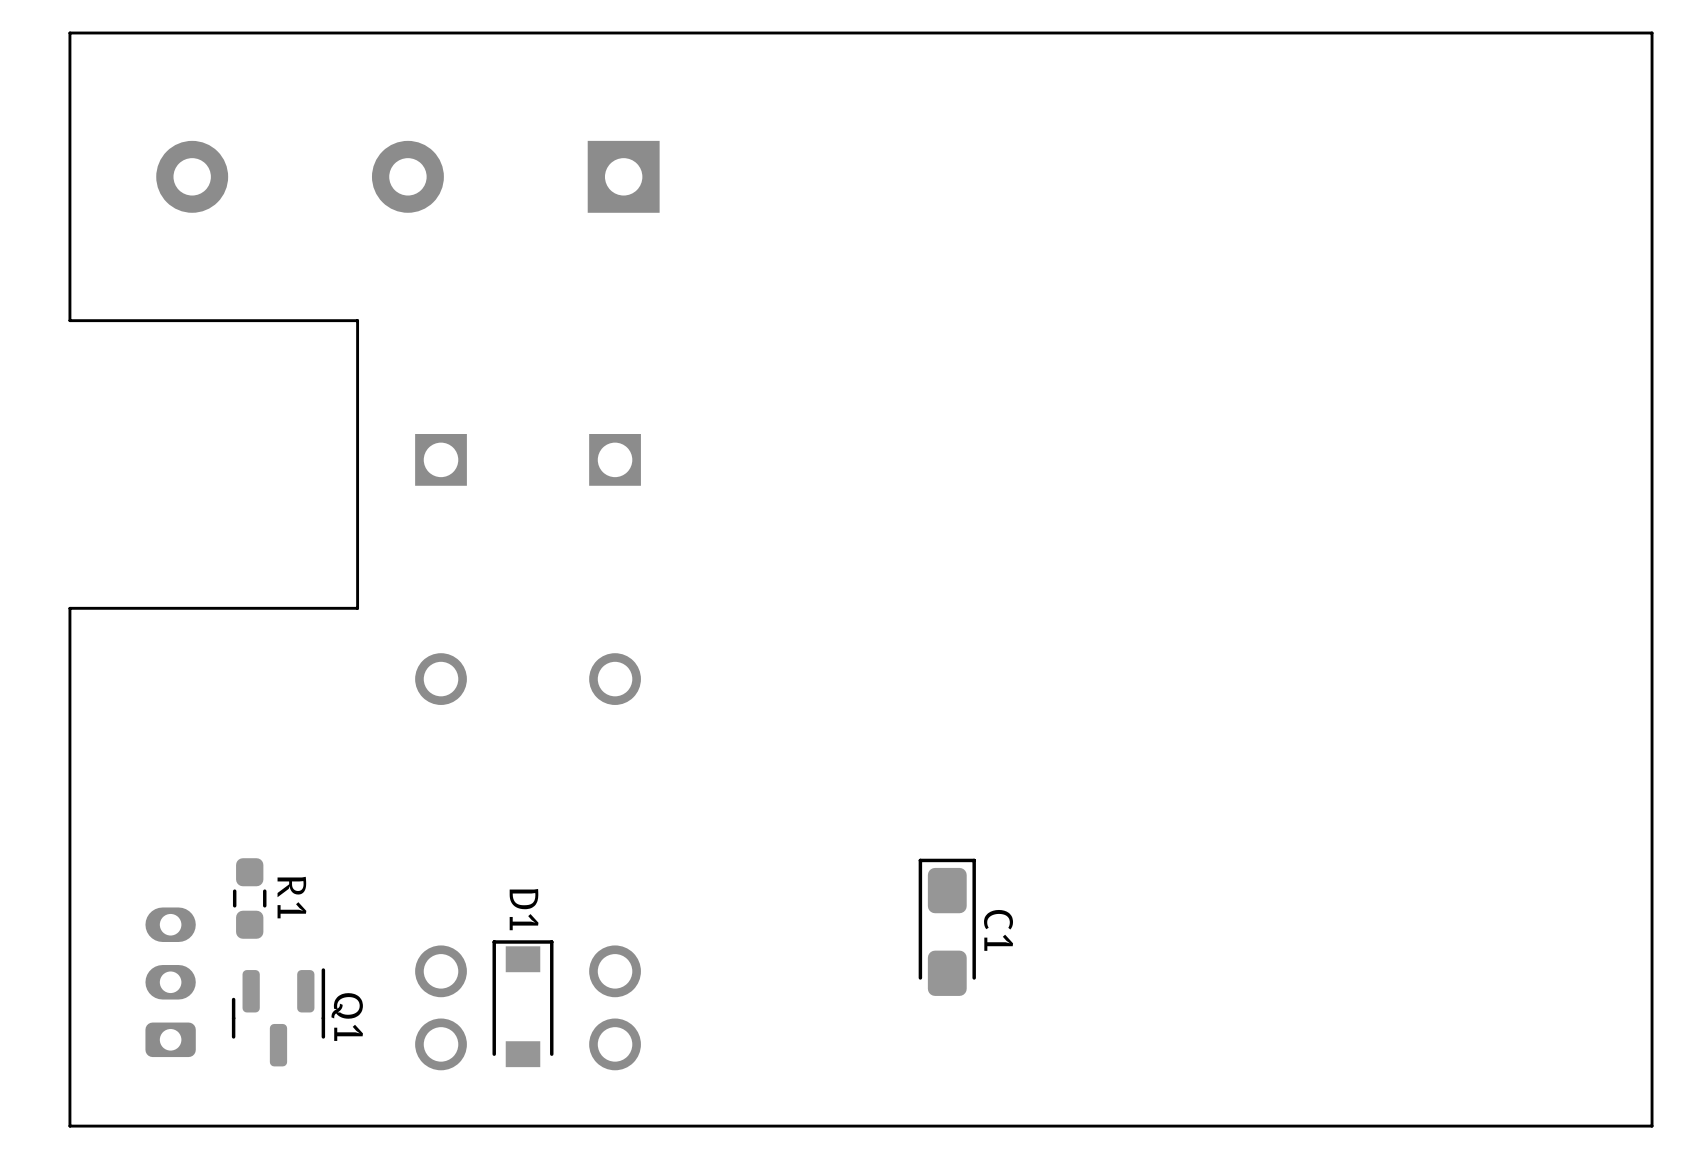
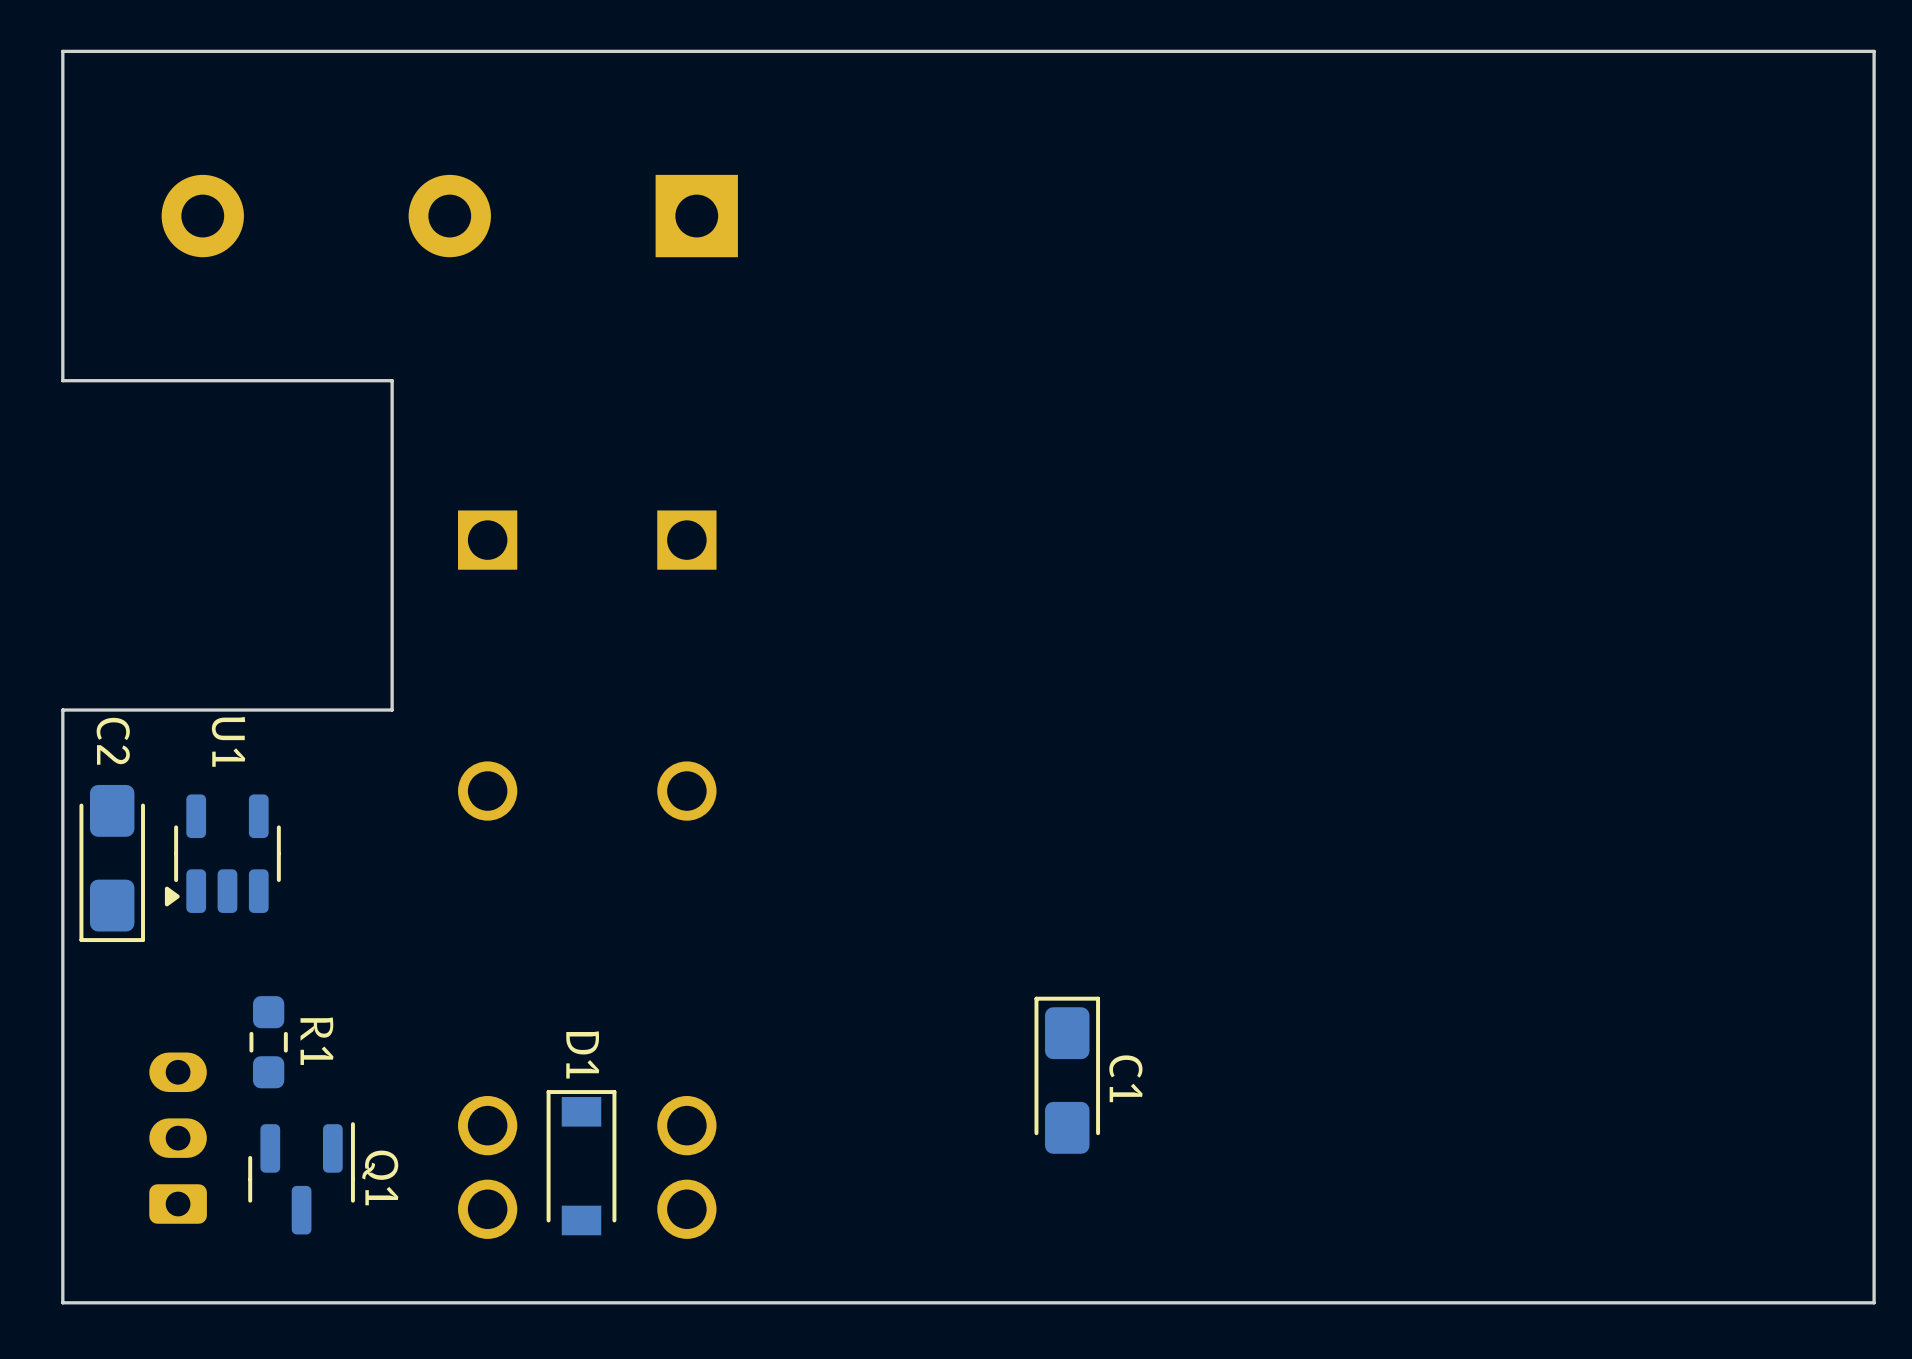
U1: none -> (222, 853)
C2: none -> (112, 863)

